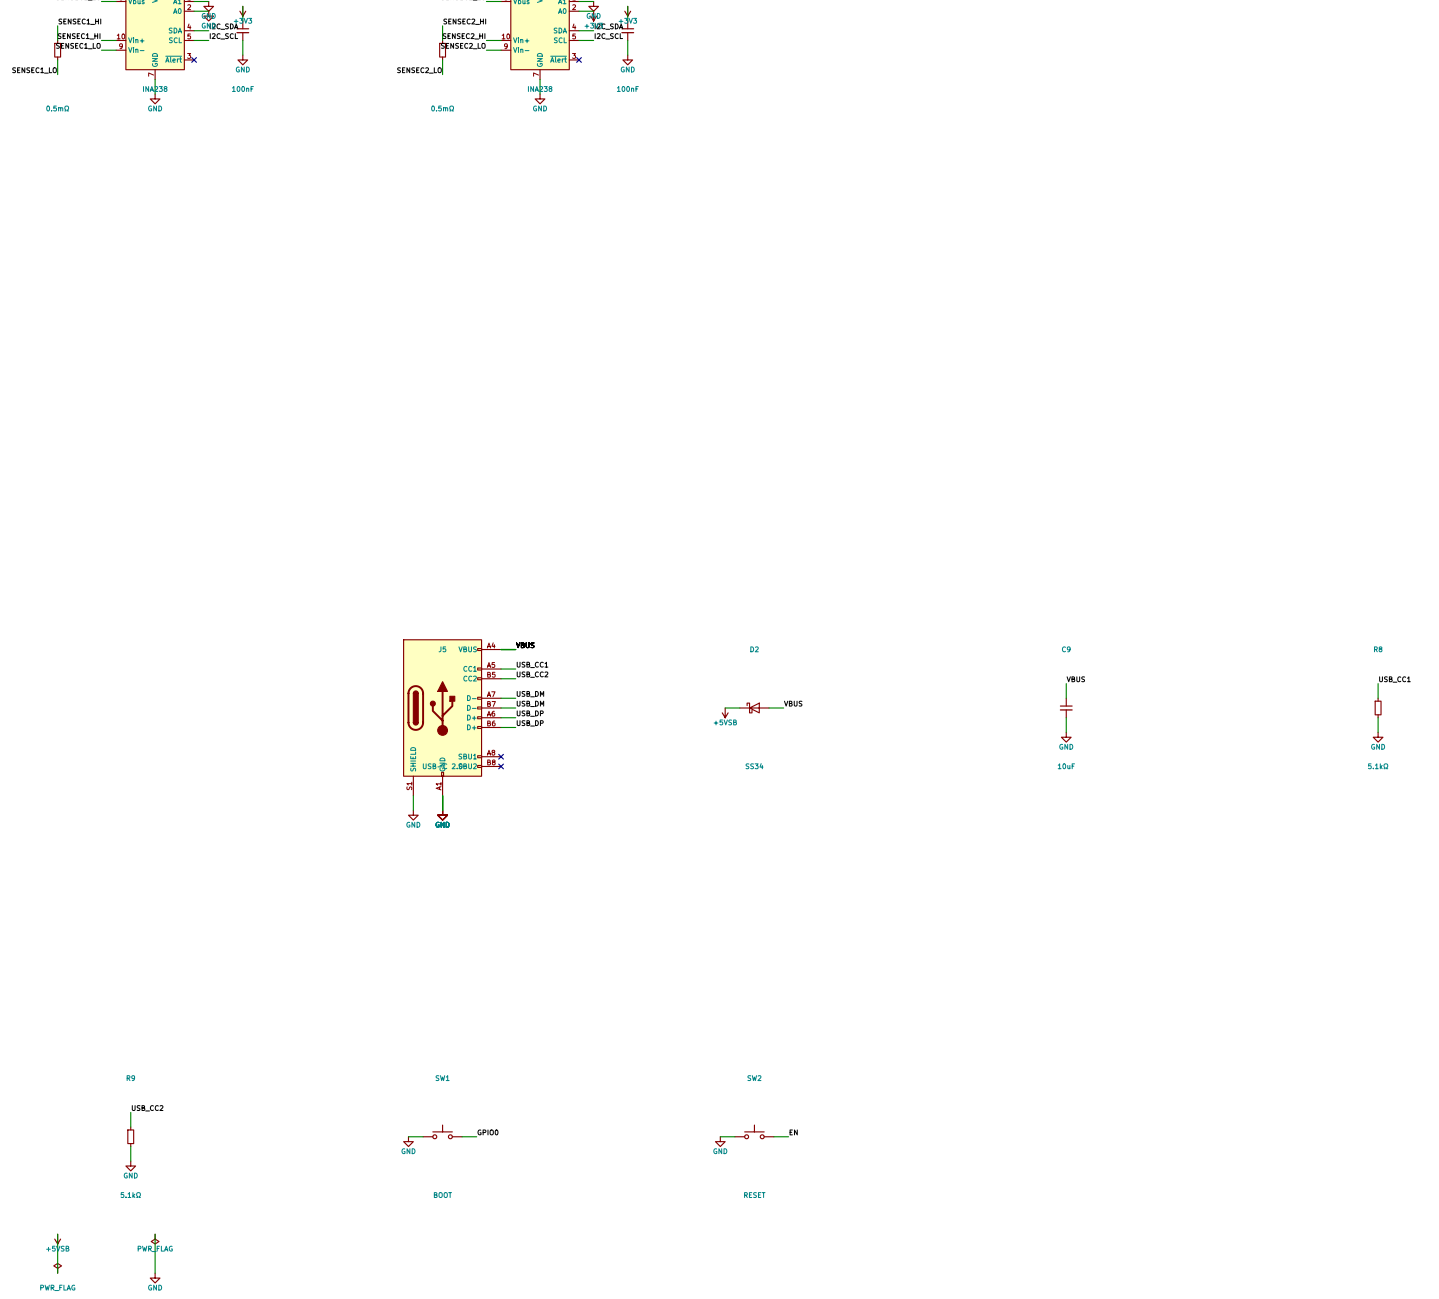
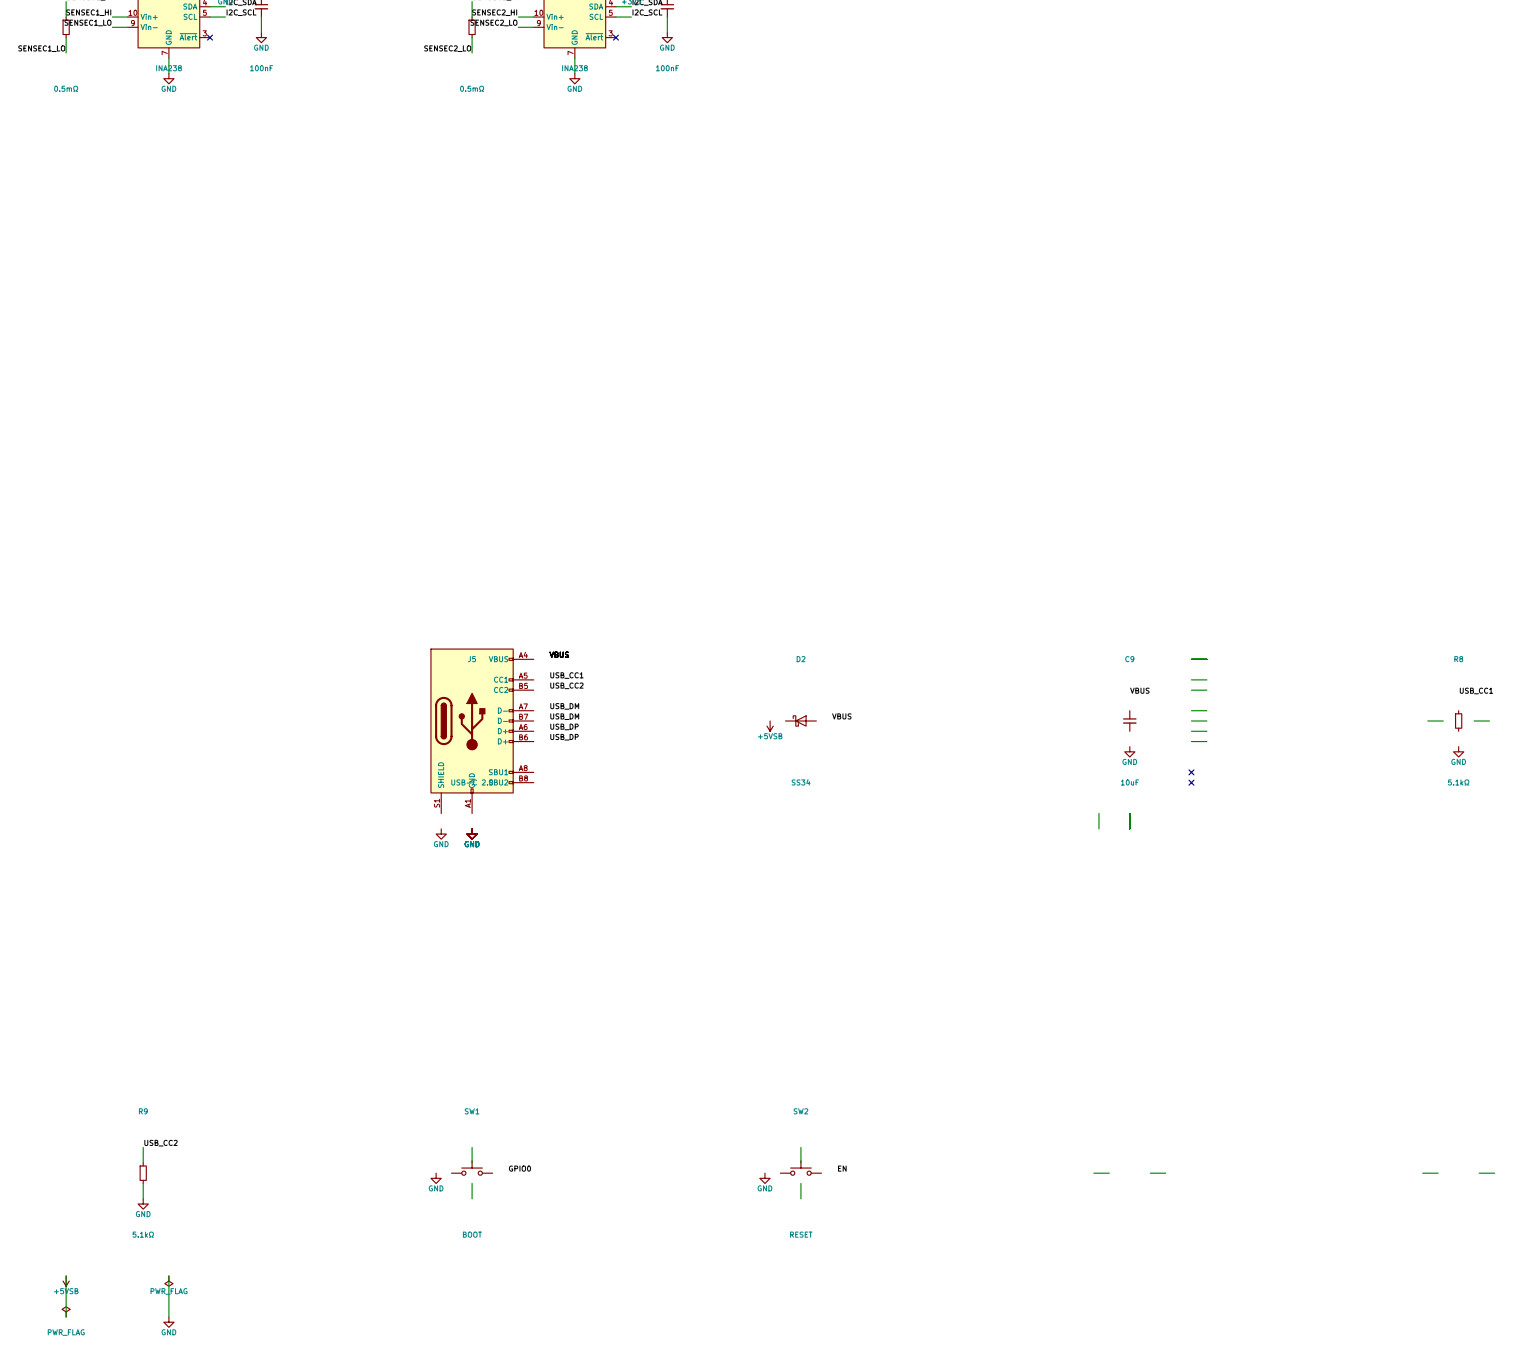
wire: (501, 649) (515, 649) -> none
wire: none -> (1191, 659) (1206, 659)
wire: (501, 669) (515, 669) -> none
wire: none -> (1191, 679) (1206, 679)
wire: (501, 678) (515, 678) -> none
wire: none -> (1191, 690) (1206, 690)
wire: (1066, 683) (1066, 698) -> none
wire: (1378, 683) (1378, 698) -> none
wire: (501, 698) (515, 698) -> none
wire: none -> (1191, 710) (1206, 710)
wire: (501, 707) (515, 707) -> none
wire: (725, 707) (739, 707) -> none
wire: (769, 707) (783, 707) -> none
wire: none -> (1191, 721) (1206, 721)
wire: none -> (1427, 721) (1443, 721)
wire: none -> (1474, 721) (1489, 721)
wire: (501, 717) (515, 717) -> none
wire: (1066, 717) (1066, 732) -> (1129, 813) (1129, 828)
wire: none -> (1191, 731) (1206, 731)
wire: (1378, 717) (1378, 732) -> none
wire: (501, 727) (515, 727) -> none
wire: none -> (1191, 741) (1206, 741)
no-connect mark: (501, 756) -> none
no-connect mark: none -> (1191, 772)
no-connect mark: (501, 766) -> none
no-connect mark: none -> (1191, 782)
wire: (413, 795) (413, 810) -> none
wire: (442, 795) (442, 810) -> none
wire: none -> (1098, 813) (1098, 828)
wire: none -> (472, 1147) (472, 1162)
wire: none -> (800, 1147) (800, 1162)
wire: (408, 1136) (423, 1136) -> none
wire: (462, 1136) (476, 1136) -> none
wire: (720, 1136) (734, 1136) -> none
wire: (773, 1136) (788, 1136) -> none
wire: none -> (1093, 1173) (1109, 1173)
wire: none -> (1150, 1173) (1165, 1173)
wire: none -> (1422, 1173) (1438, 1173)
wire: none -> (1479, 1173) (1494, 1173)
wire: none -> (472, 1183) (472, 1198)
wire: none -> (800, 1183) (800, 1198)

